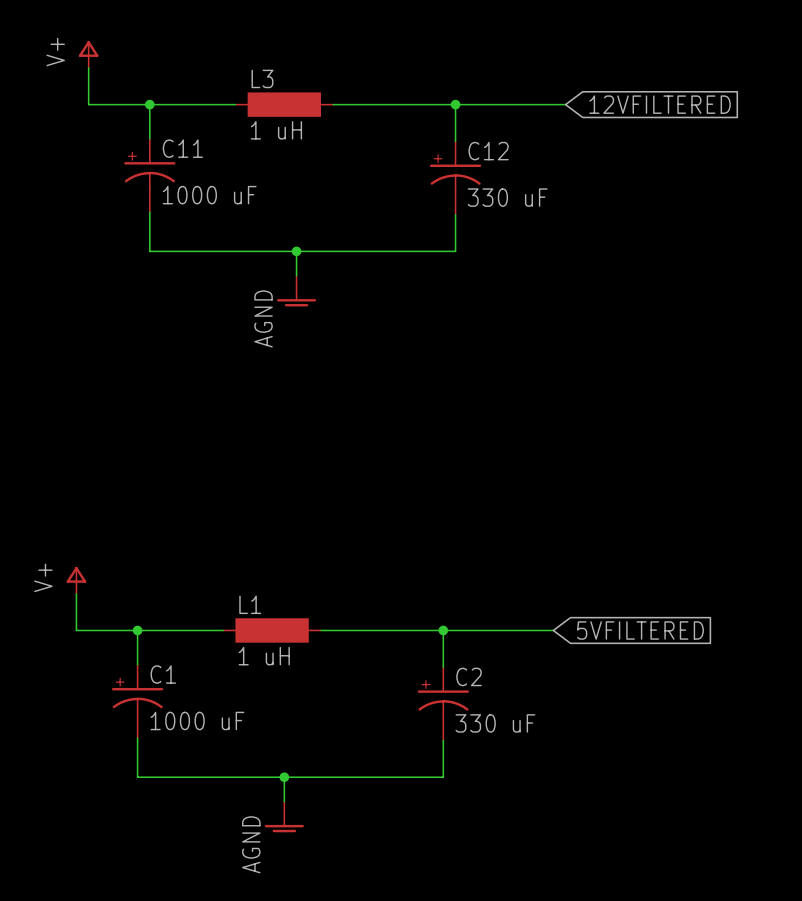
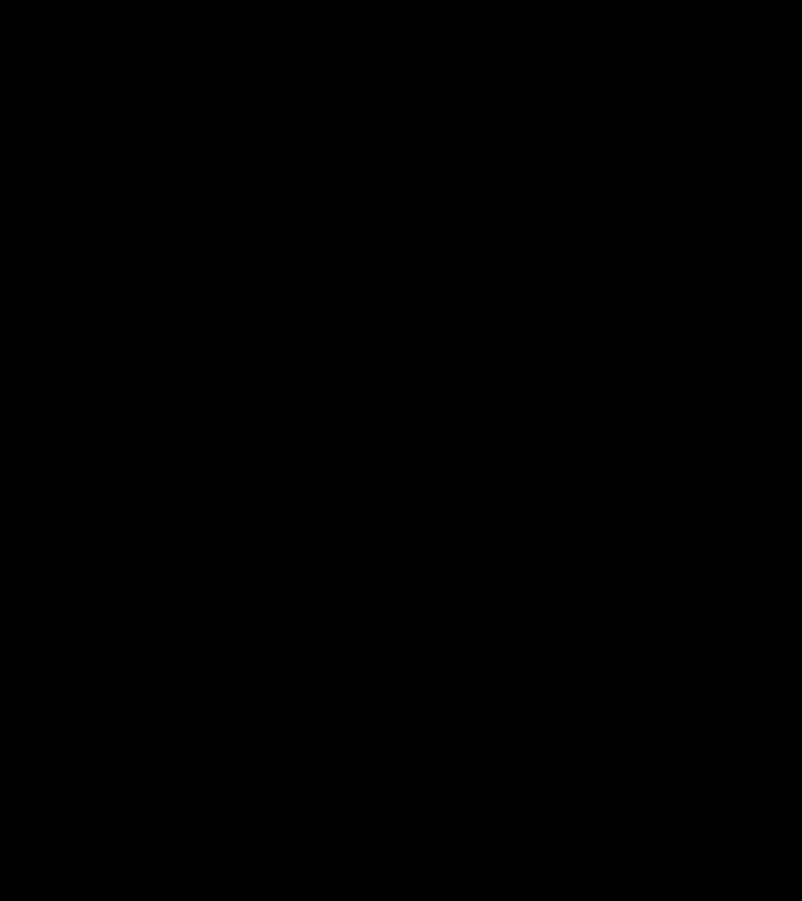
power symbol: V+ (88, 54) -> none
wire: (88, 67) (88, 104) (235, 104) -> none
wire: (149, 104) (149, 138) -> none
junction: (149, 104) -> none
L3: 1 uH (284, 104) -> none
wire: (333, 104) (565, 104) -> none
wire: (455, 104) (455, 141) -> none
junction: (455, 104) -> none
global label: 12VFILTERED (660, 104) -> none
C11: 1000 uF (149, 175) -> none
C12: 330 uF (455, 178) -> none
wire: (149, 212) (149, 251) (455, 251) (455, 214) -> none
wire: (296, 251) (296, 275) -> none
junction: (296, 251) -> none
power symbol: AGND (296, 291) -> none
power symbol: V+ (76, 580) -> none
wire: (76, 593) (76, 630) (223, 630) -> none
wire: (137, 630) (137, 664) -> none
junction: (137, 630) -> none
L1: 1 uH (272, 630) -> none
wire: (321, 630) (553, 630) -> none
wire: (443, 630) (443, 667) -> none
junction: (443, 630) -> none
global label: 5VFILTERED (640, 630) -> none
C1: 1000 uF (137, 701) -> none
C2: 330 uF (443, 703) -> none
wire: (137, 738) (137, 777) (443, 777) (443, 740) -> none
wire: (284, 777) (284, 801) -> none
junction: (284, 777) -> none
power symbol: AGND (284, 816) -> none

